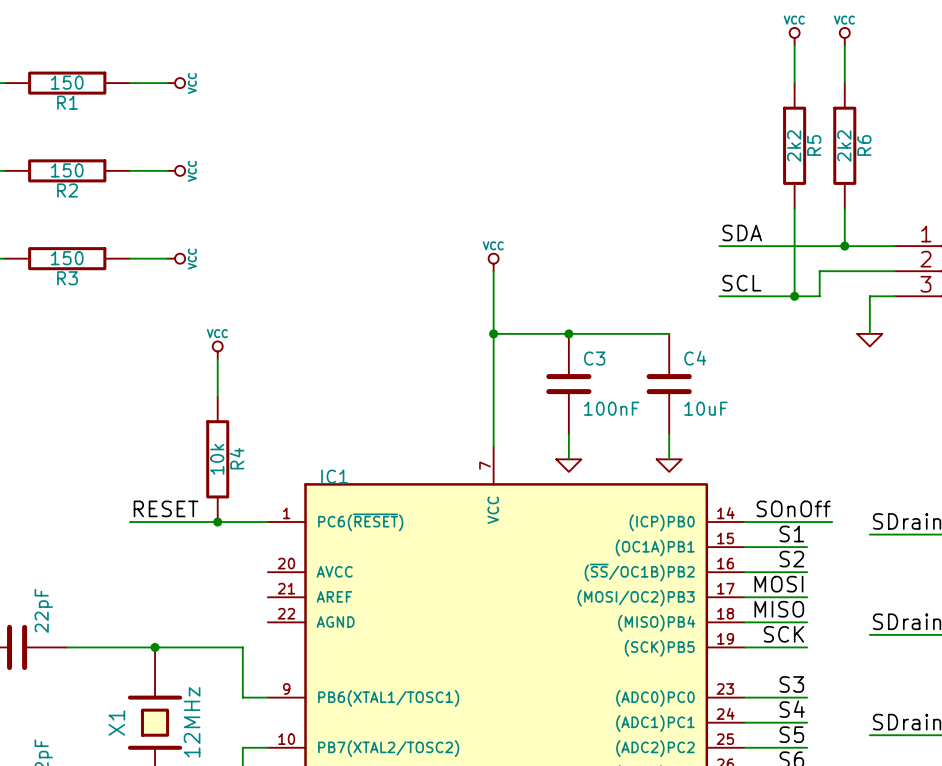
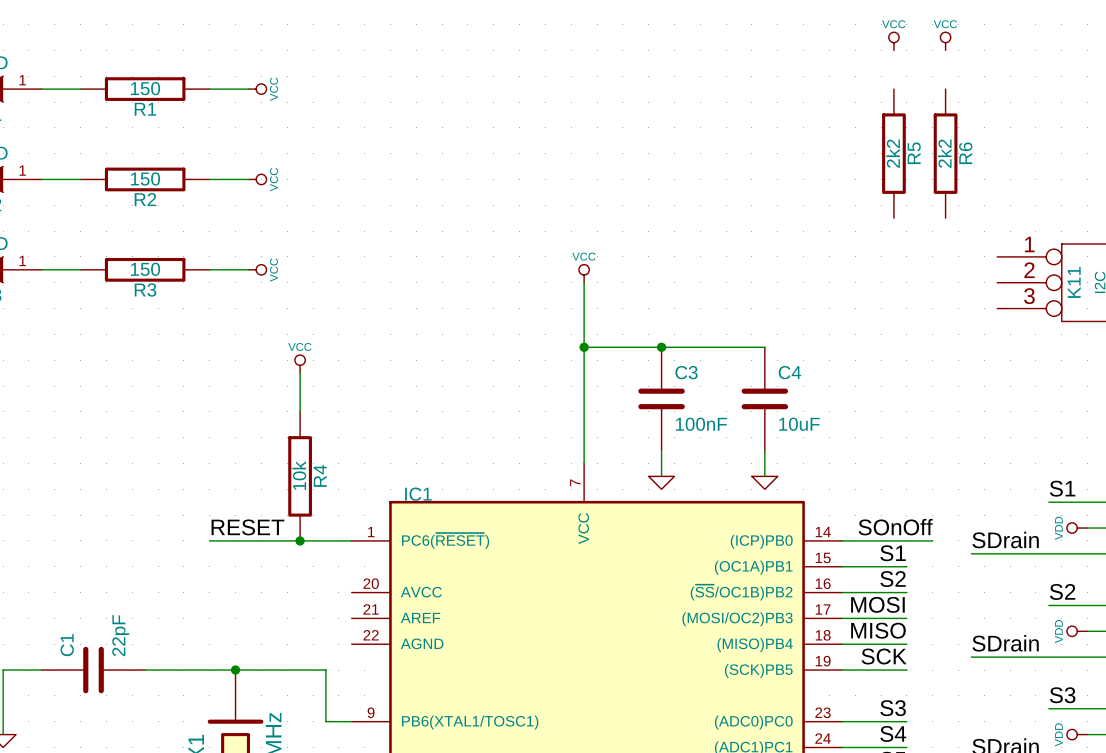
wire: (794, 45) (794, 83) -> none
wire: (844, 45) (844, 83) -> none
wire: (794, 208) (794, 296) -> none
wire: (844, 208) (844, 246) -> none
label: SDA (742, 233) -> none
wire: (719, 246) (894, 246) -> none
junction: (844, 246) -> none
wire: (894, 271) (819, 271) (819, 296) (719, 296) -> none
label: SCL (741, 283) -> none
junction: (794, 296) -> none
wire: (894, 296) (869, 296) (869, 333) -> none
power symbol: (869, 340) -> none

